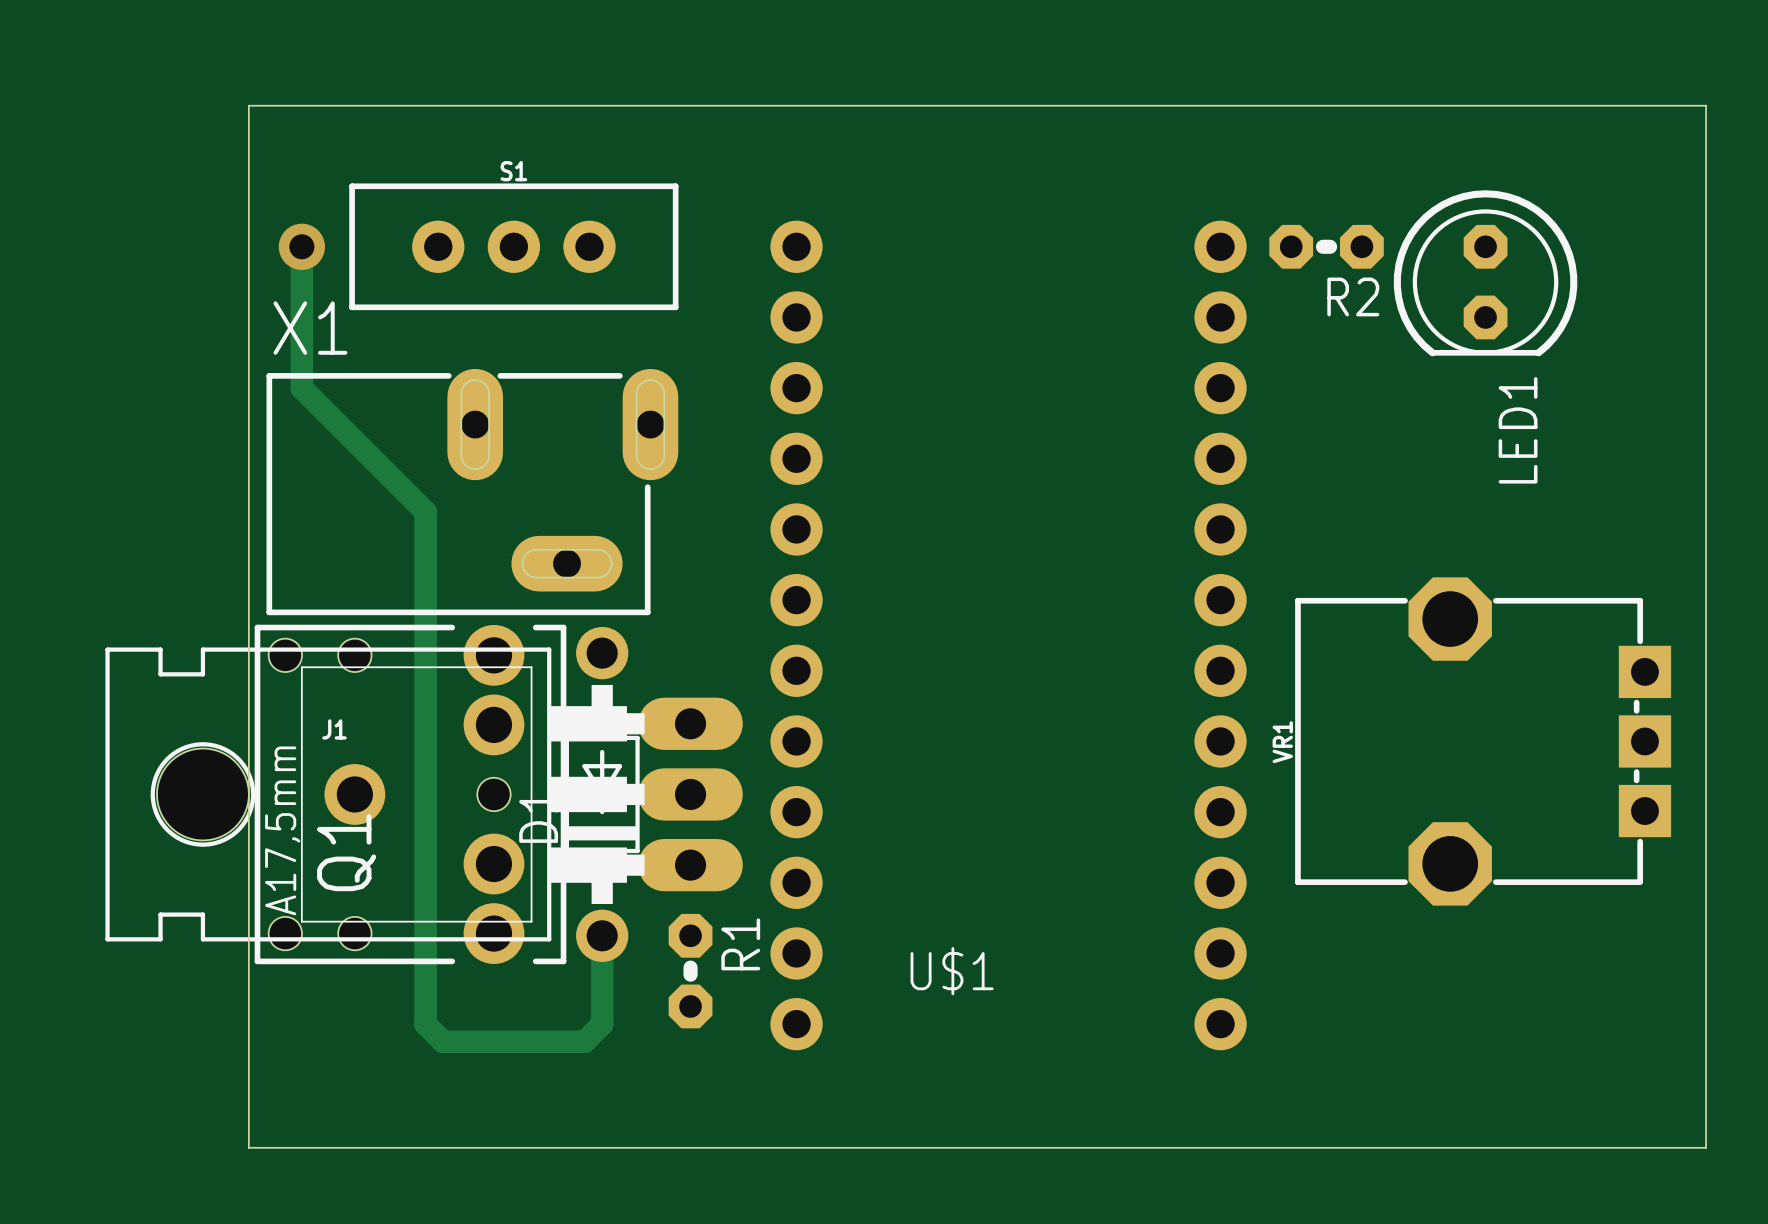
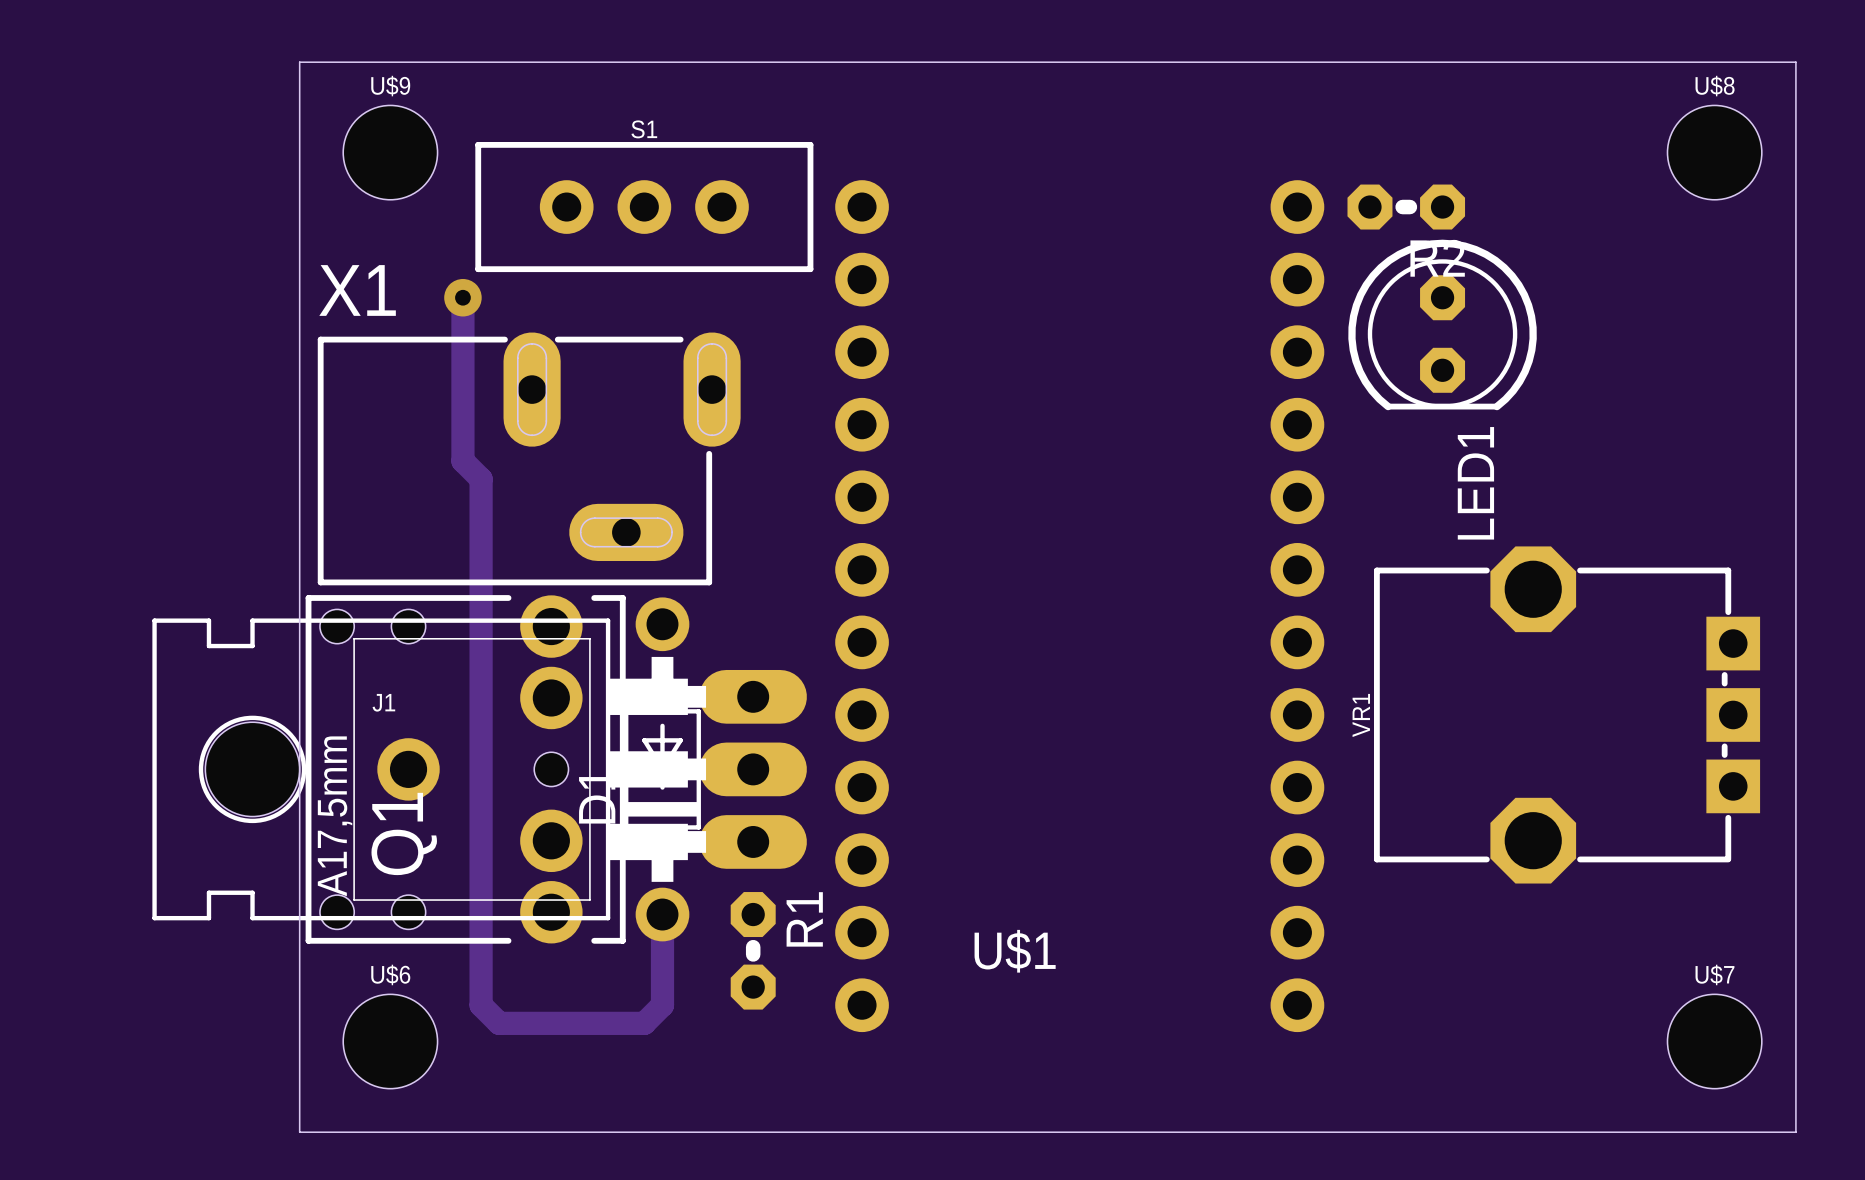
U$9: none -> (390, 152)
U$8: none -> (1714, 152)
track: (301, 246) (301, 388) (407, 494) -> (462, 297) (462, 461)
via: (301, 246) -> none
S1 position: (513, 246) -> (644, 207)
LED1 position: (1485, 273) -> (1442, 324)
via: none -> (462, 297)
U$6: none -> (390, 1041)
U$7: none -> (1714, 1041)

